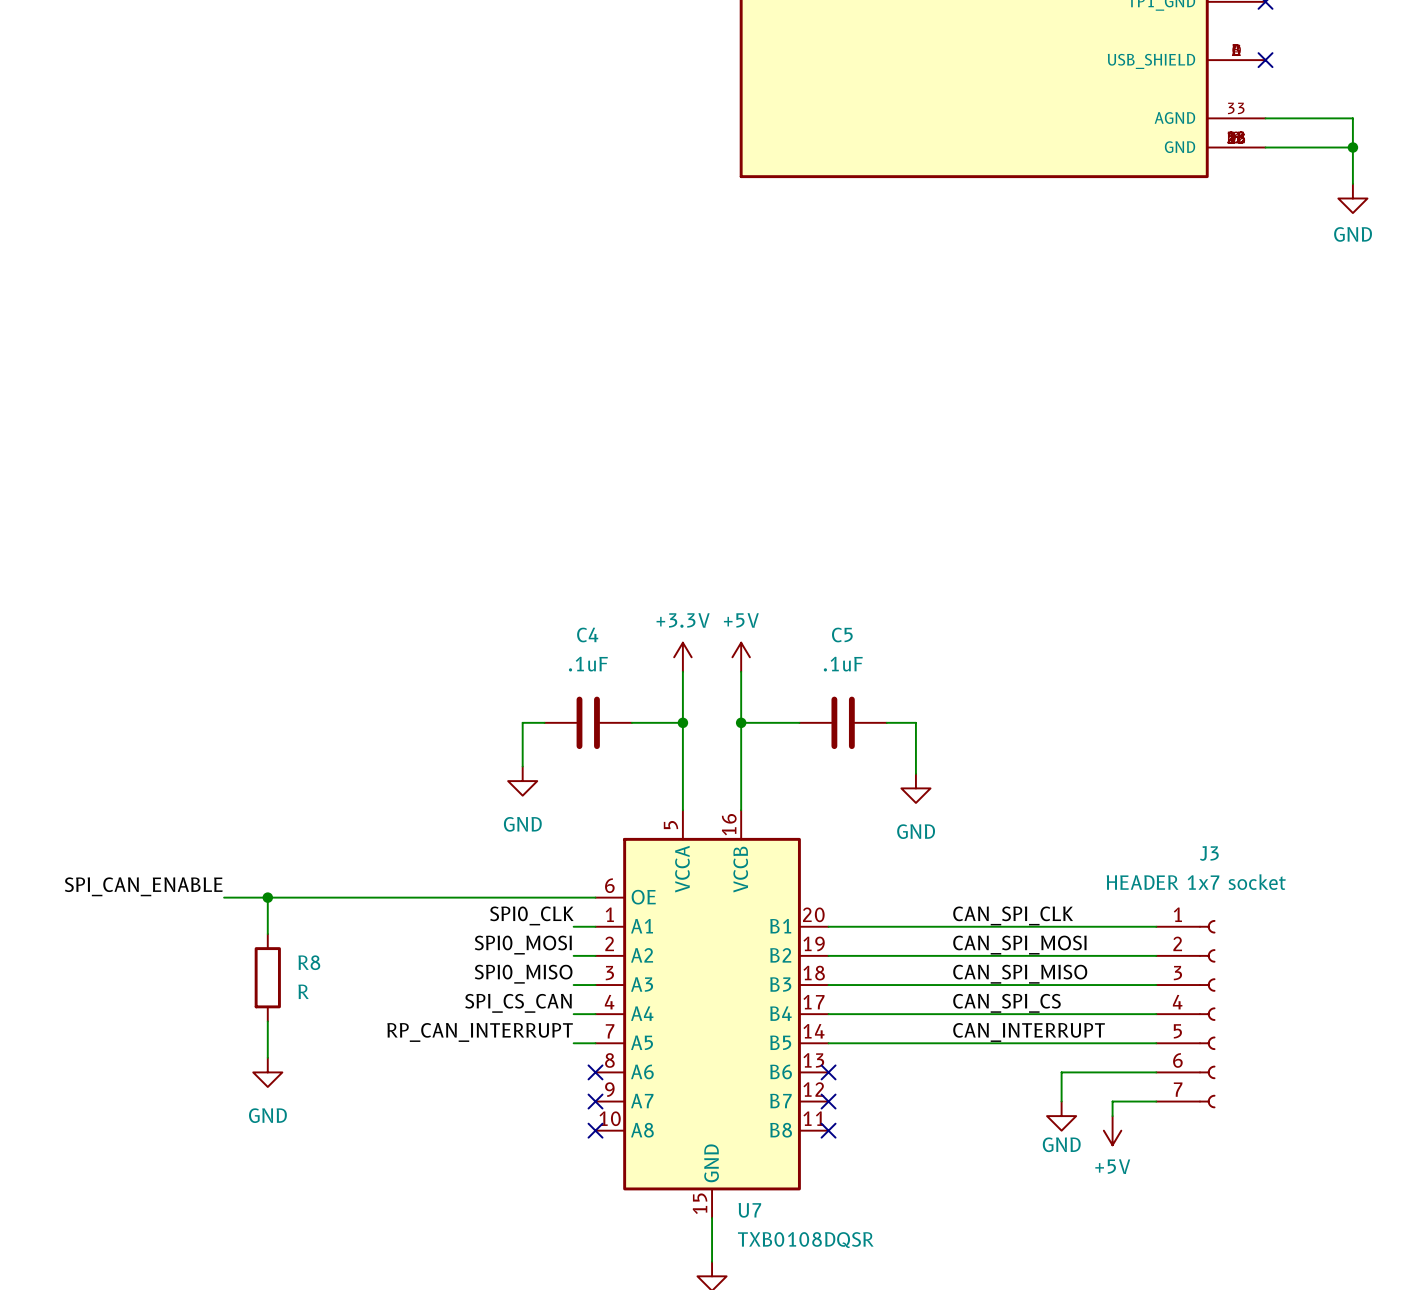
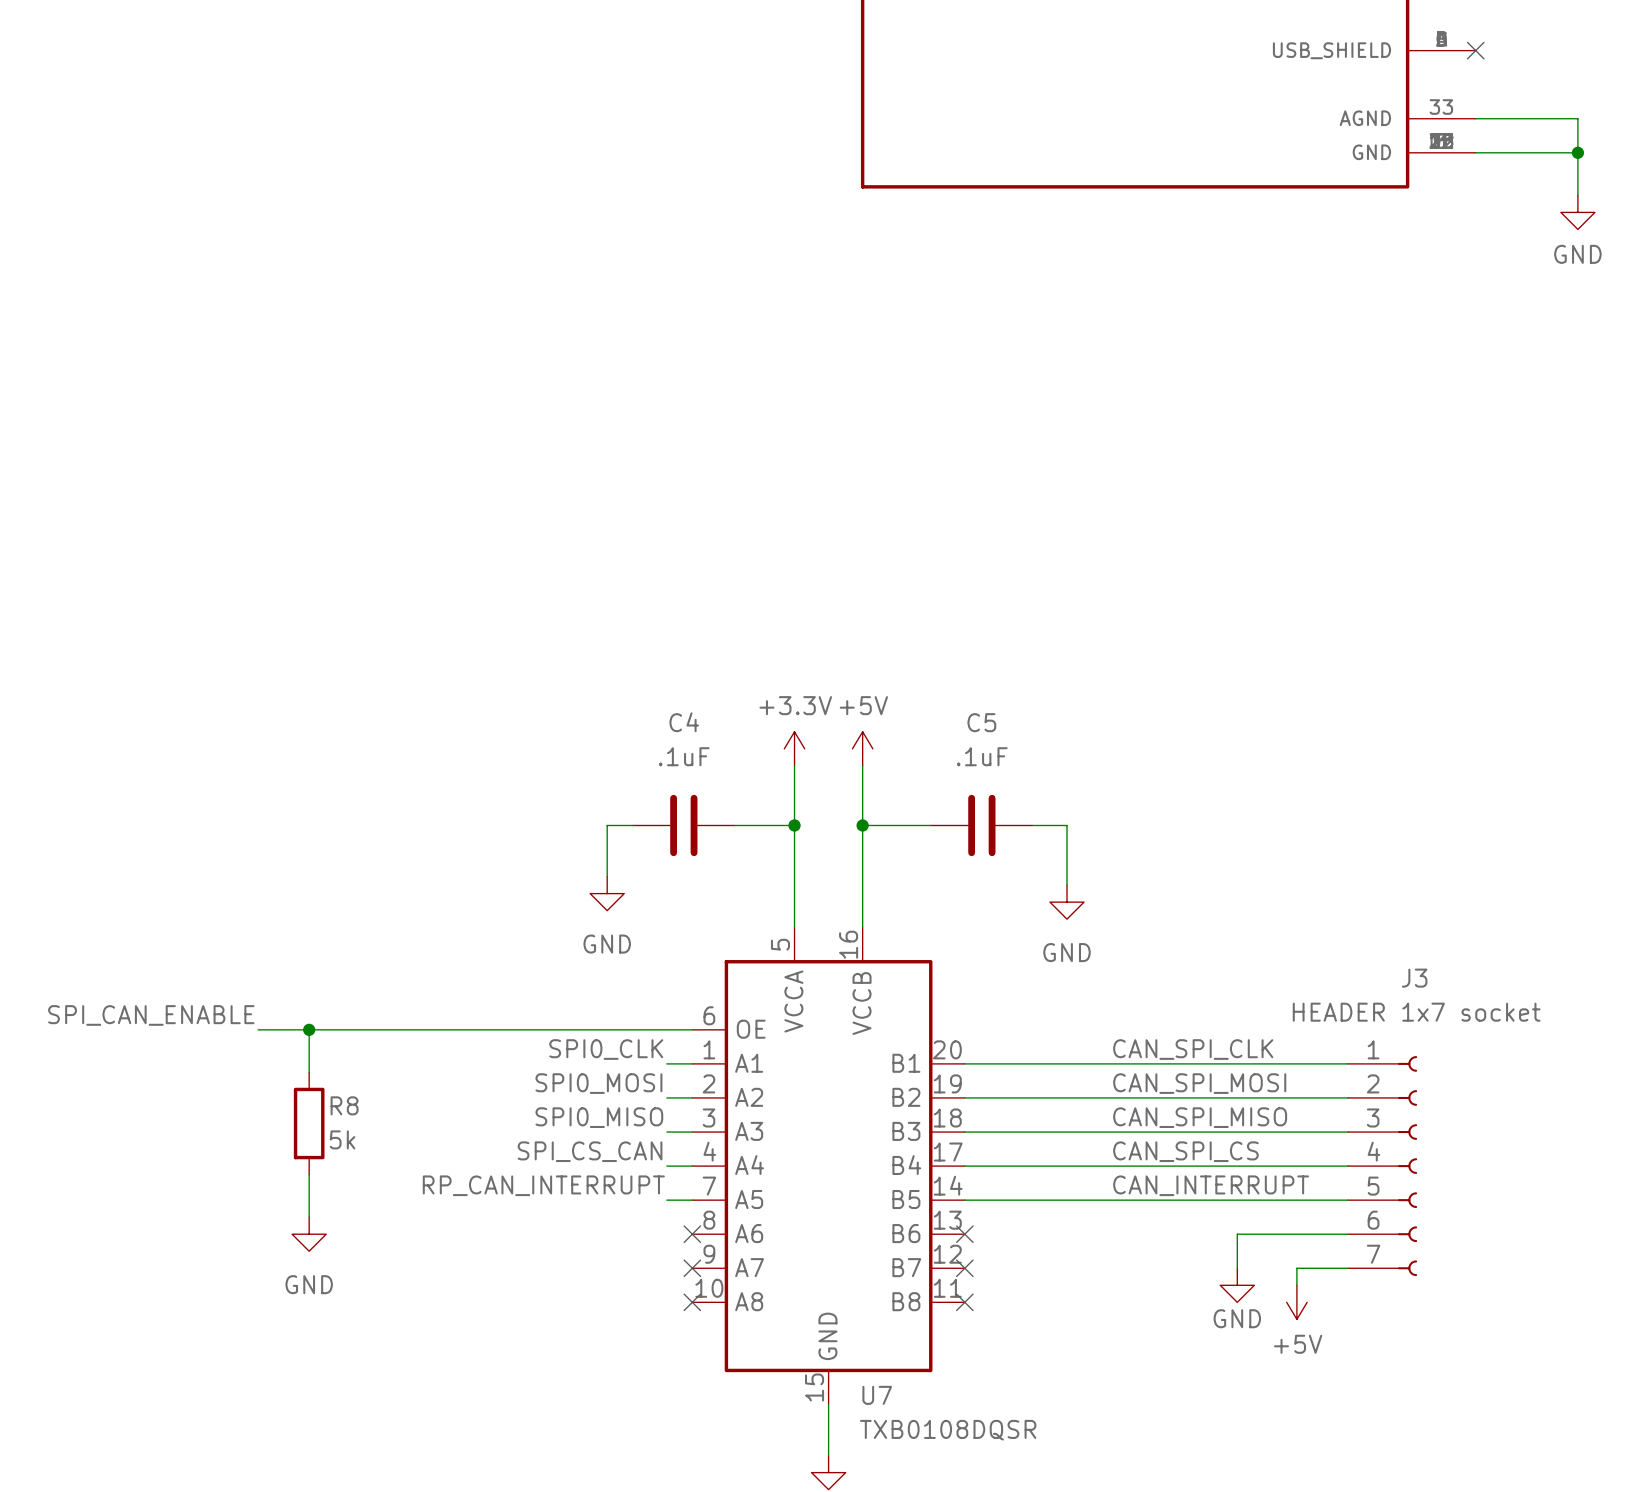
R8 name position: R8 (309, 962) -> R8 (344, 1105)
R8 value: R (303, 991) -> 5k (342, 1139)

